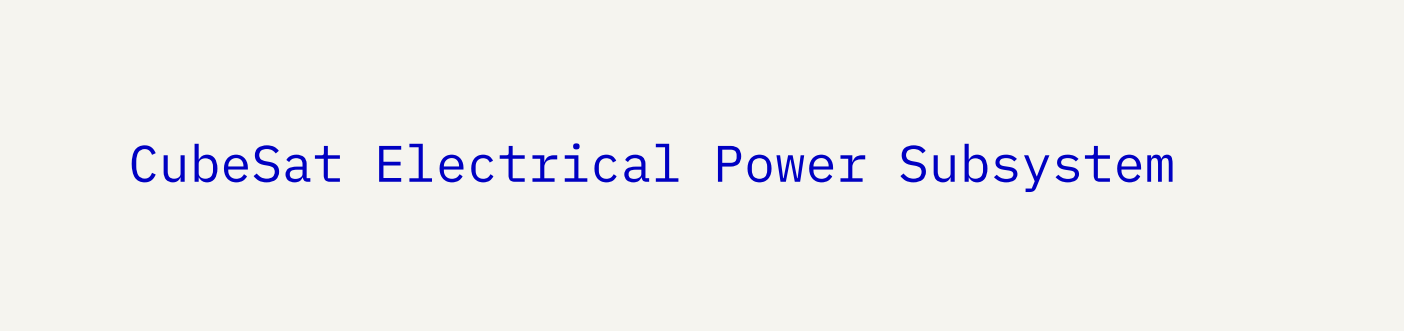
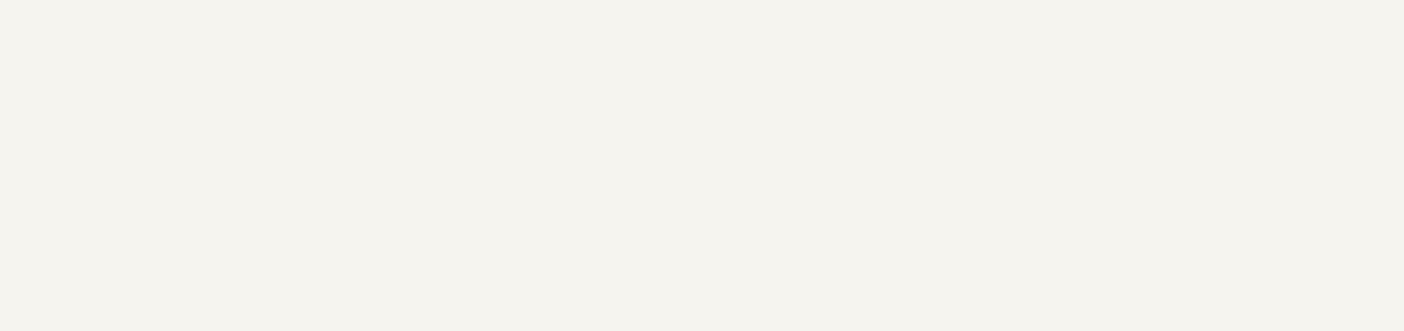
text: CubeSat Electrical Power Subsystem (652, 167) -> none

